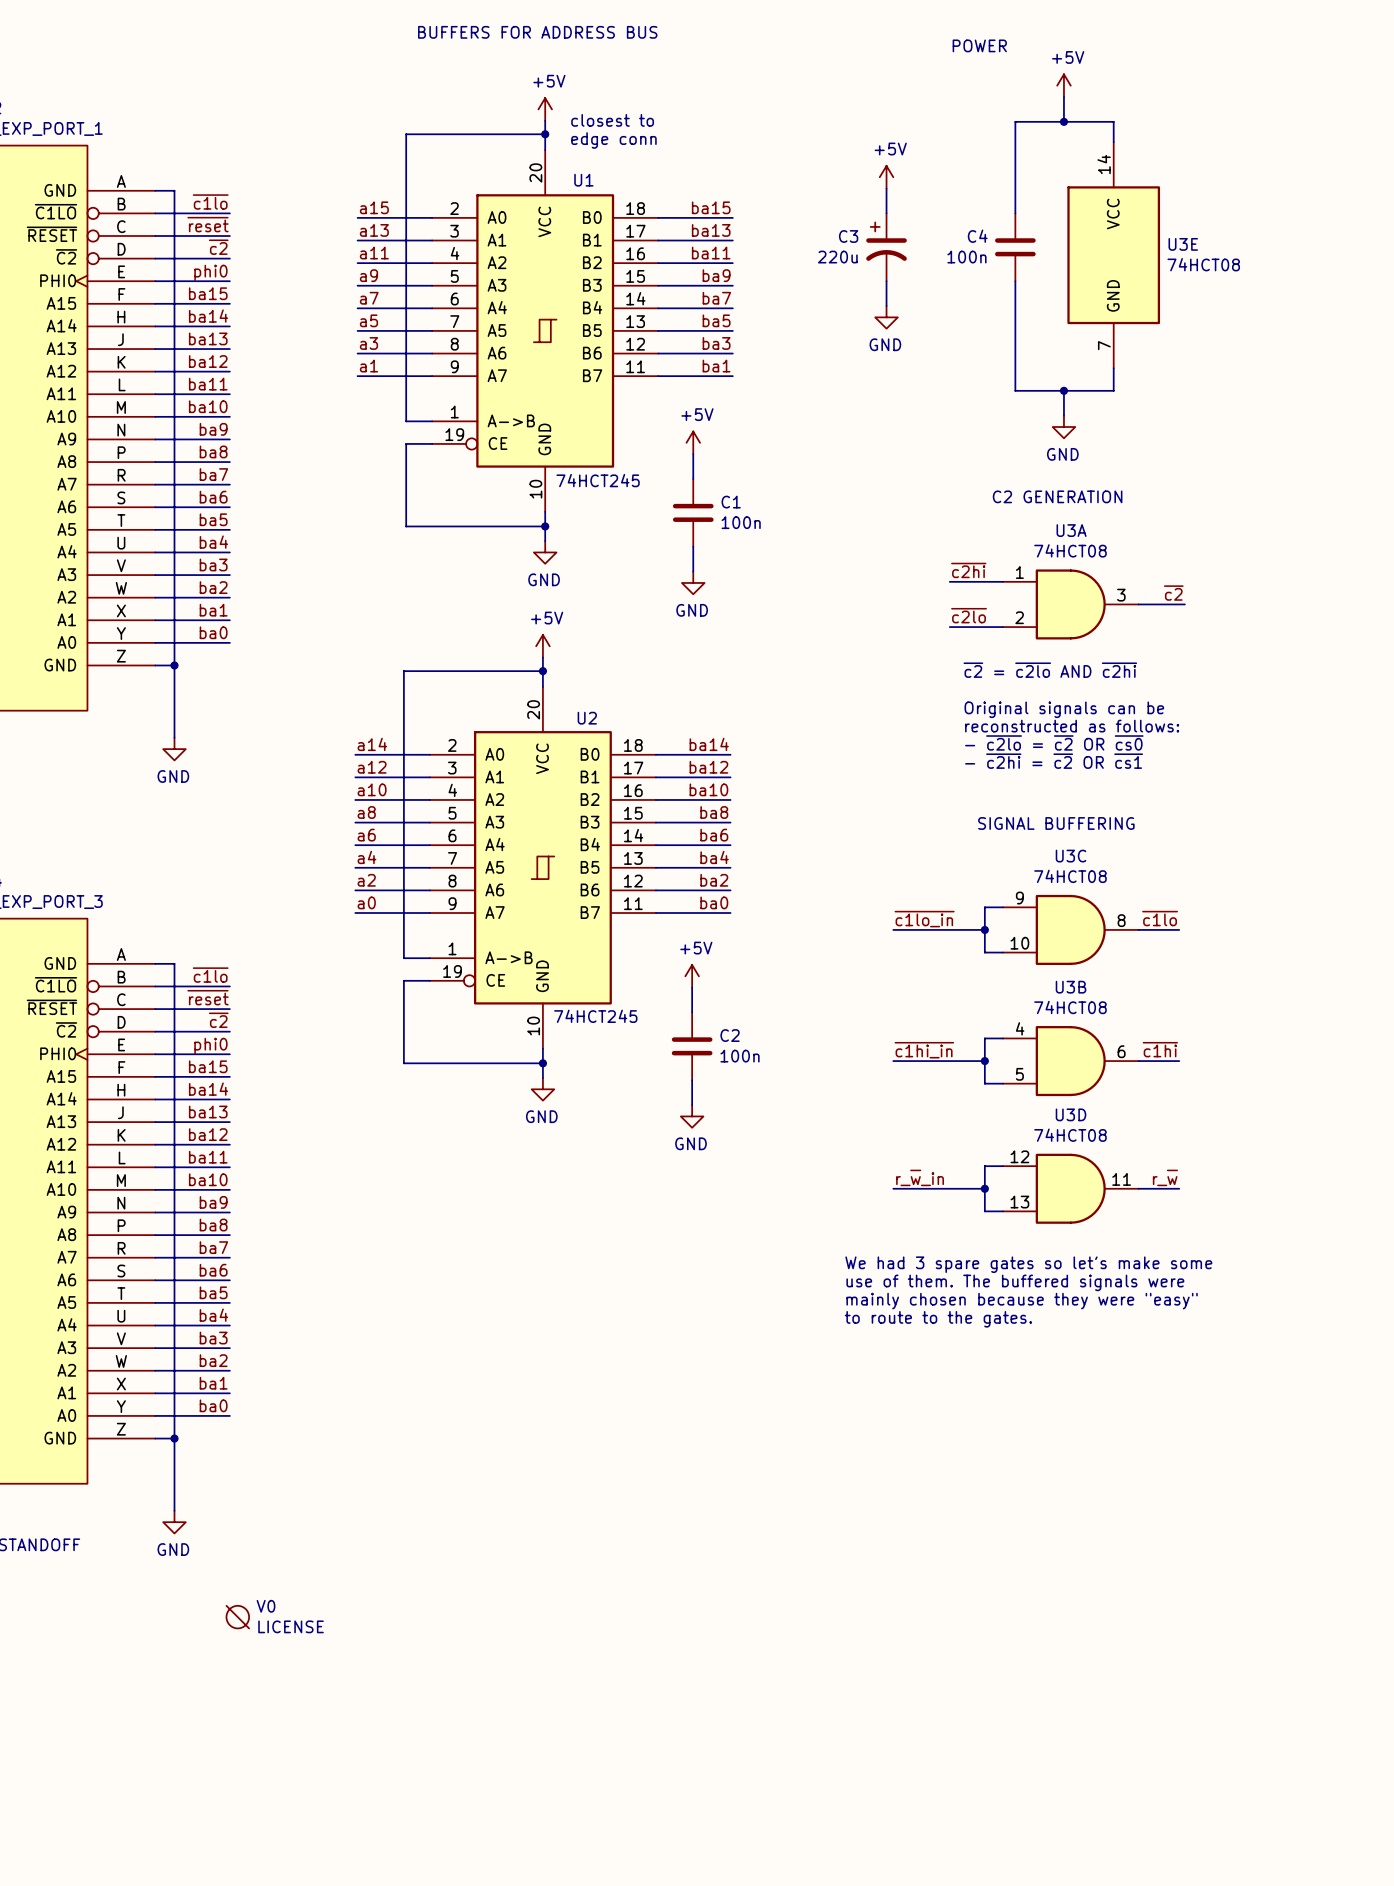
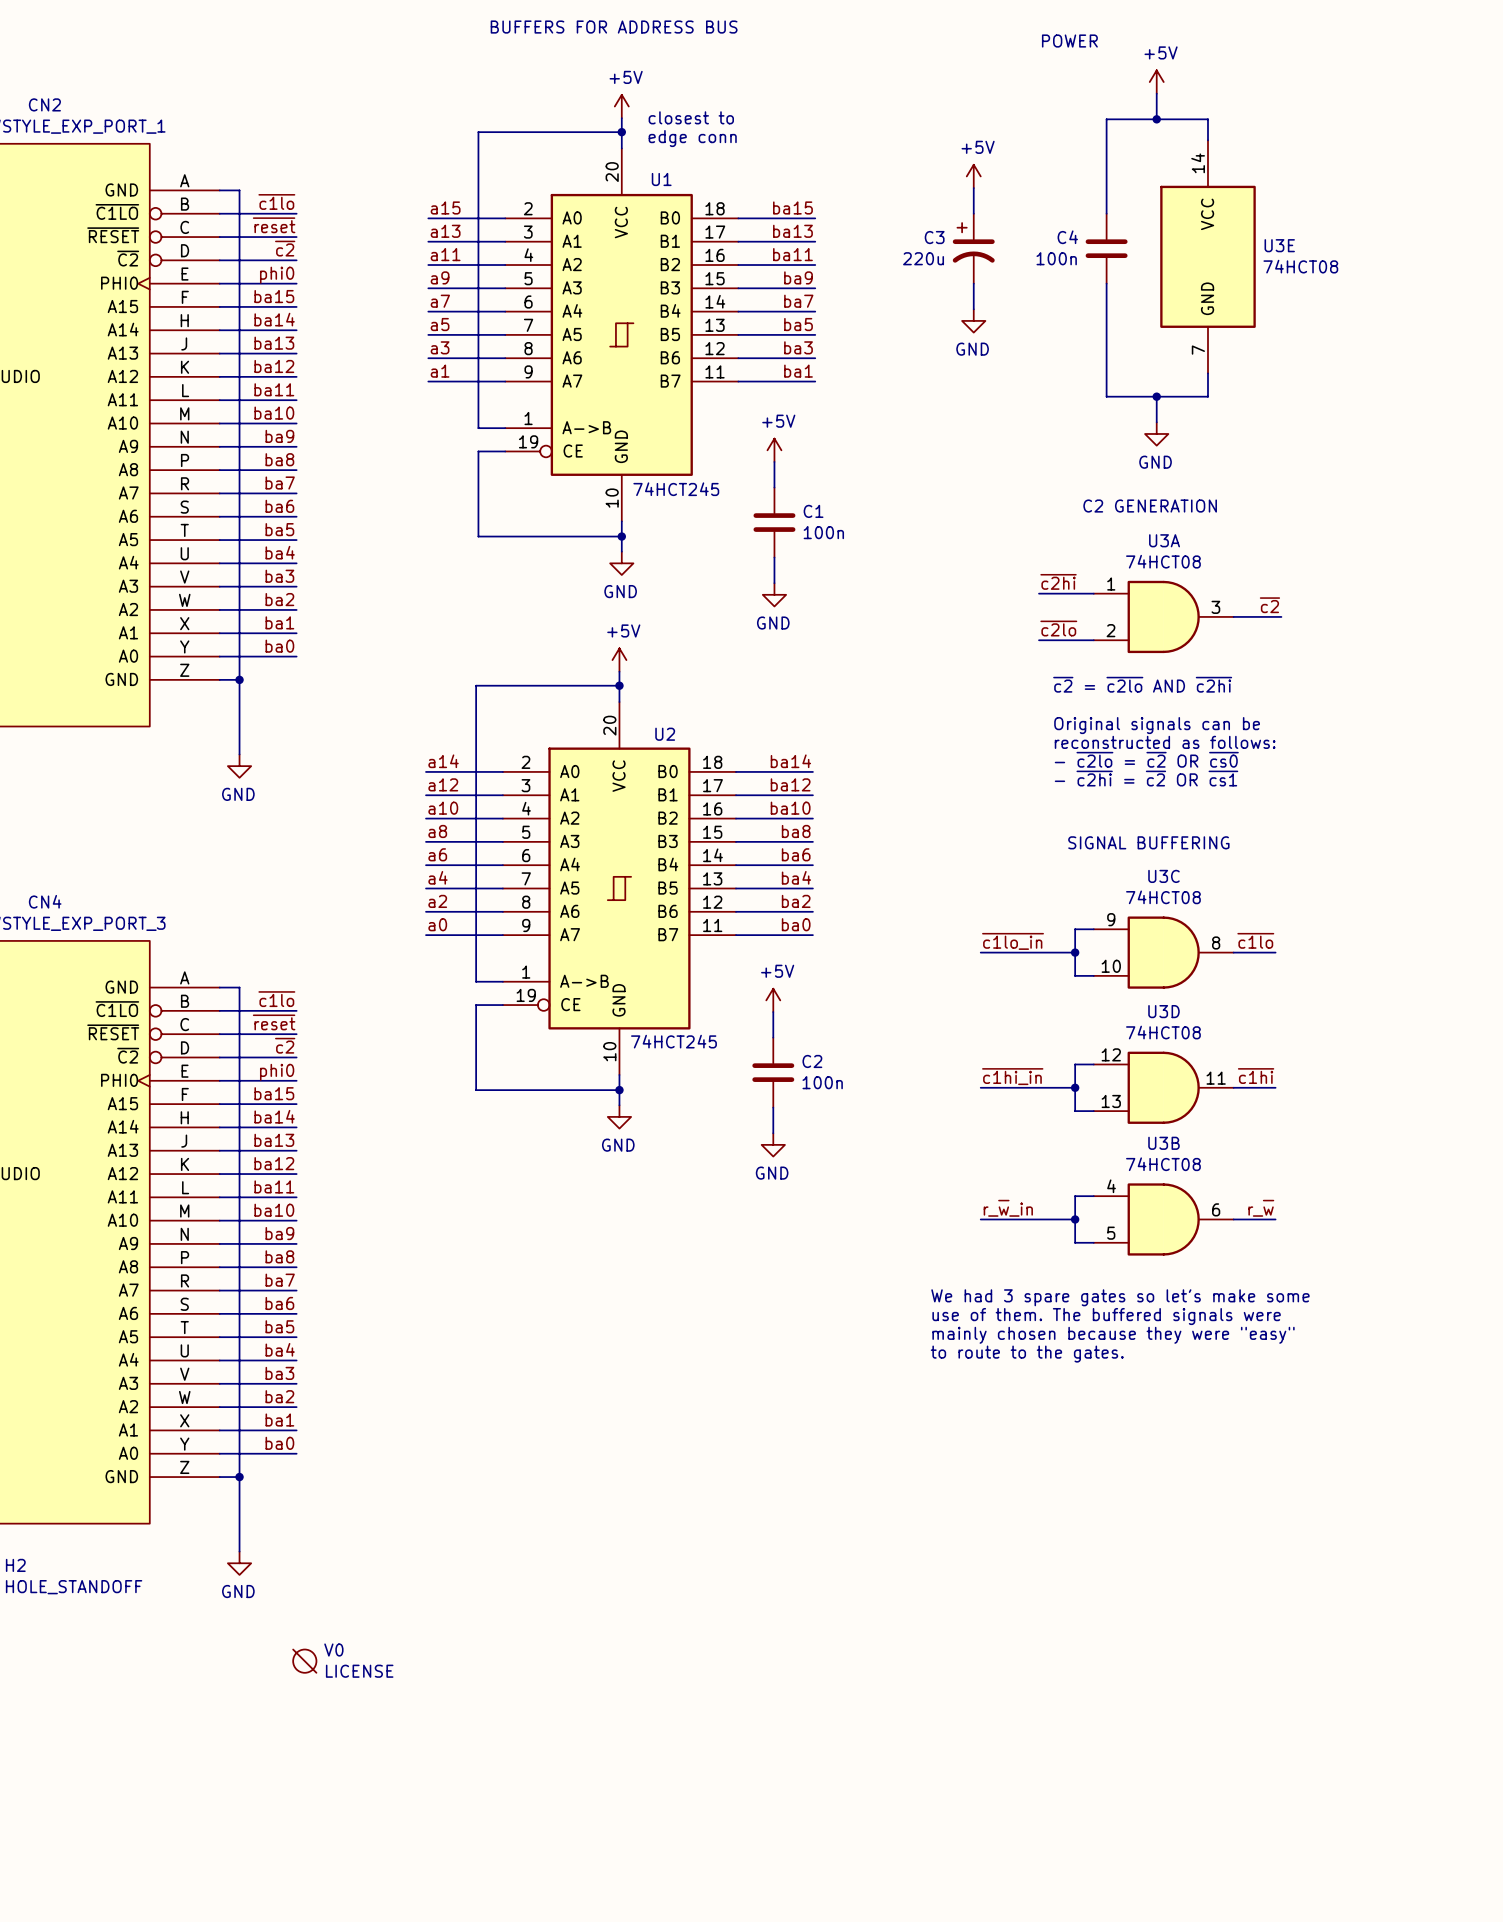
U3B position: (1070, 1061) -> (1163, 1219)
U3D position: (1070, 1188) -> (1163, 1087)

